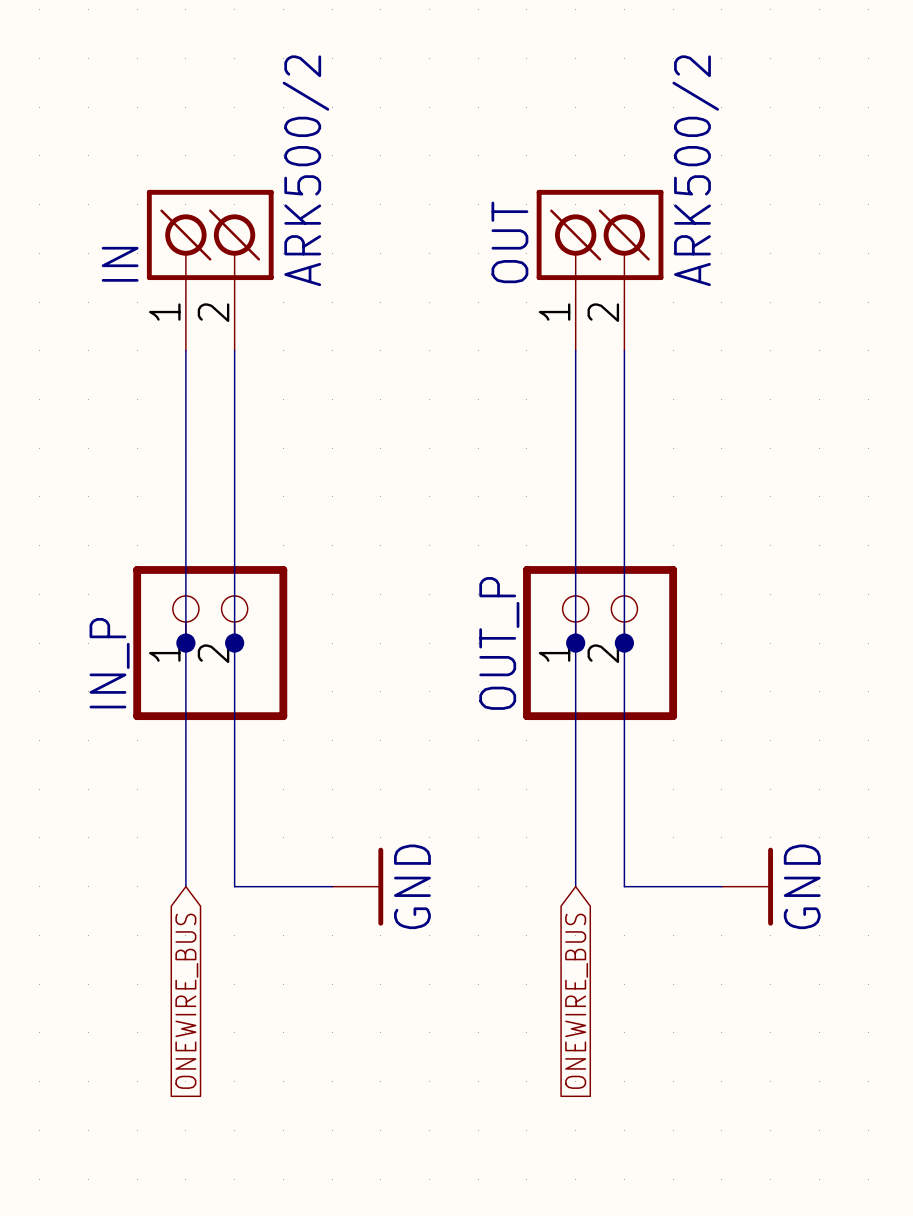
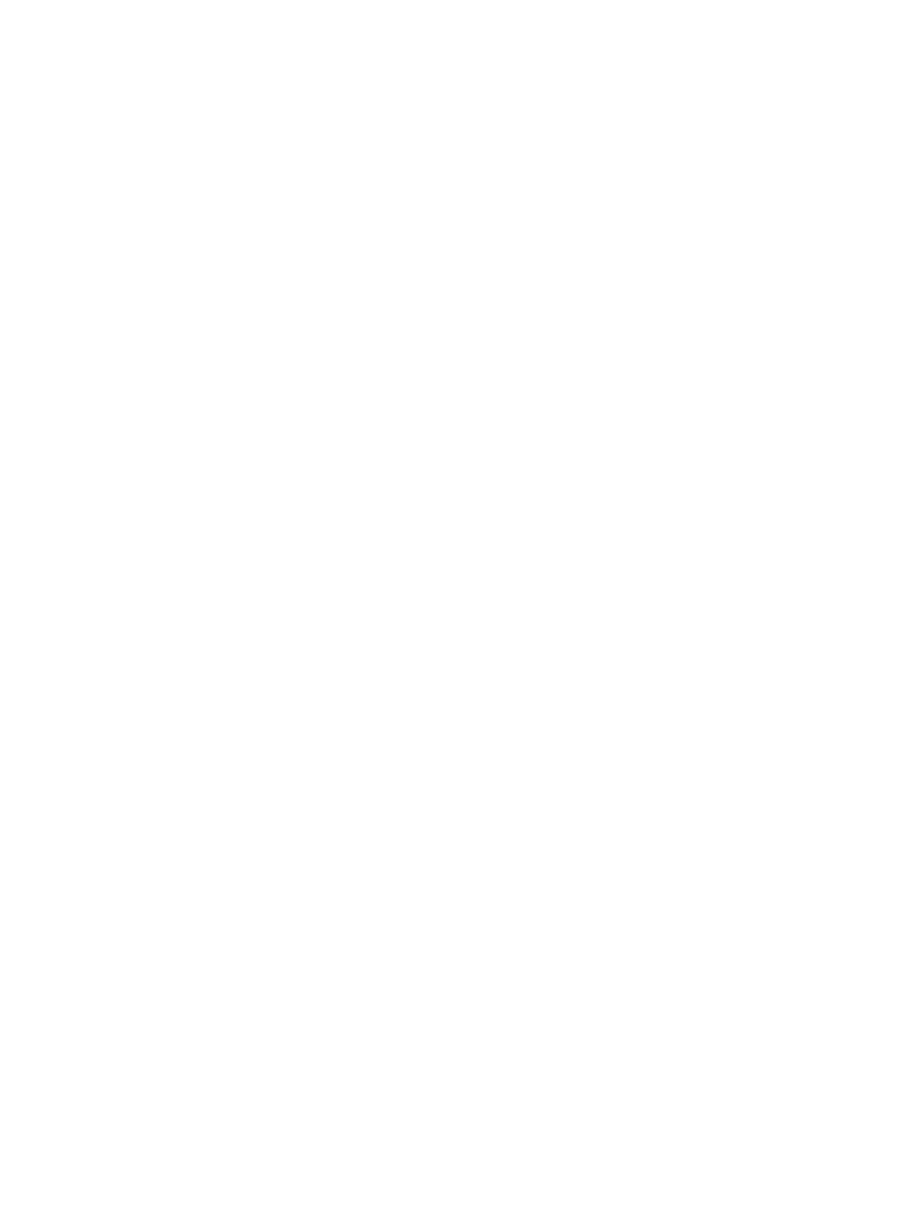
IN: ARK500/2 (210, 270) -> none
OUT: ARK500/2 (600, 270) -> none
wire: (185, 350) (185, 886) -> none
wire: (234, 350) (234, 886) (332, 886) -> none
wire: (575, 350) (575, 886) -> none
wire: (624, 350) (624, 886) (721, 886) -> none
junction: (185, 643) -> none
IN_P: (210, 643) -> none
junction: (234, 643) -> none
junction: (575, 643) -> none
OUT_P: (600, 643) -> none
junction: (624, 643) -> none
power symbol: GND (357, 886) -> none
power symbol: GND (747, 886) -> none
global label: ONEWIRE_BUS (186, 1001) -> none
global label: ONEWIRE_BUS (576, 1001) -> none

